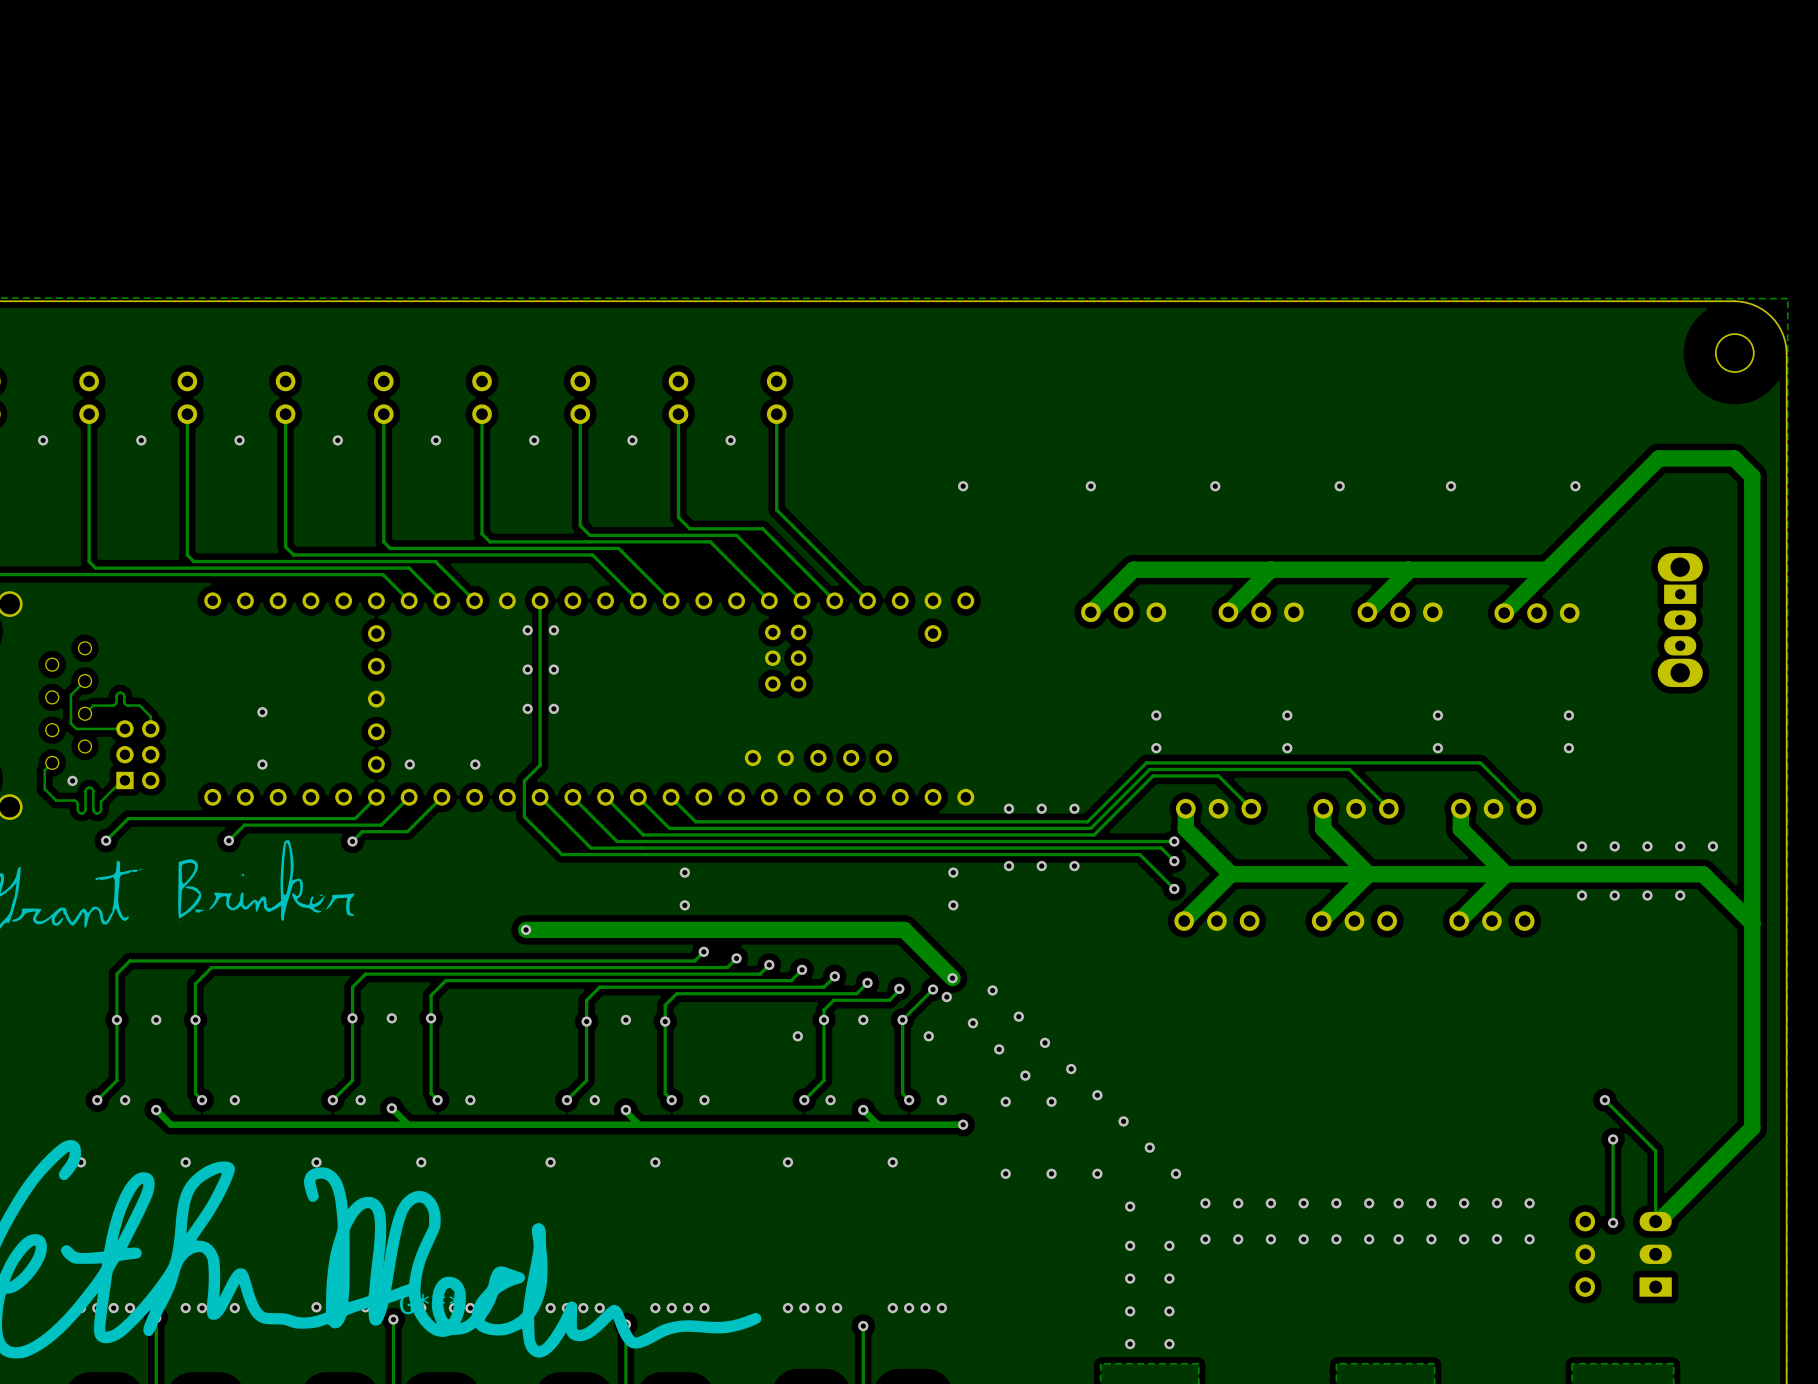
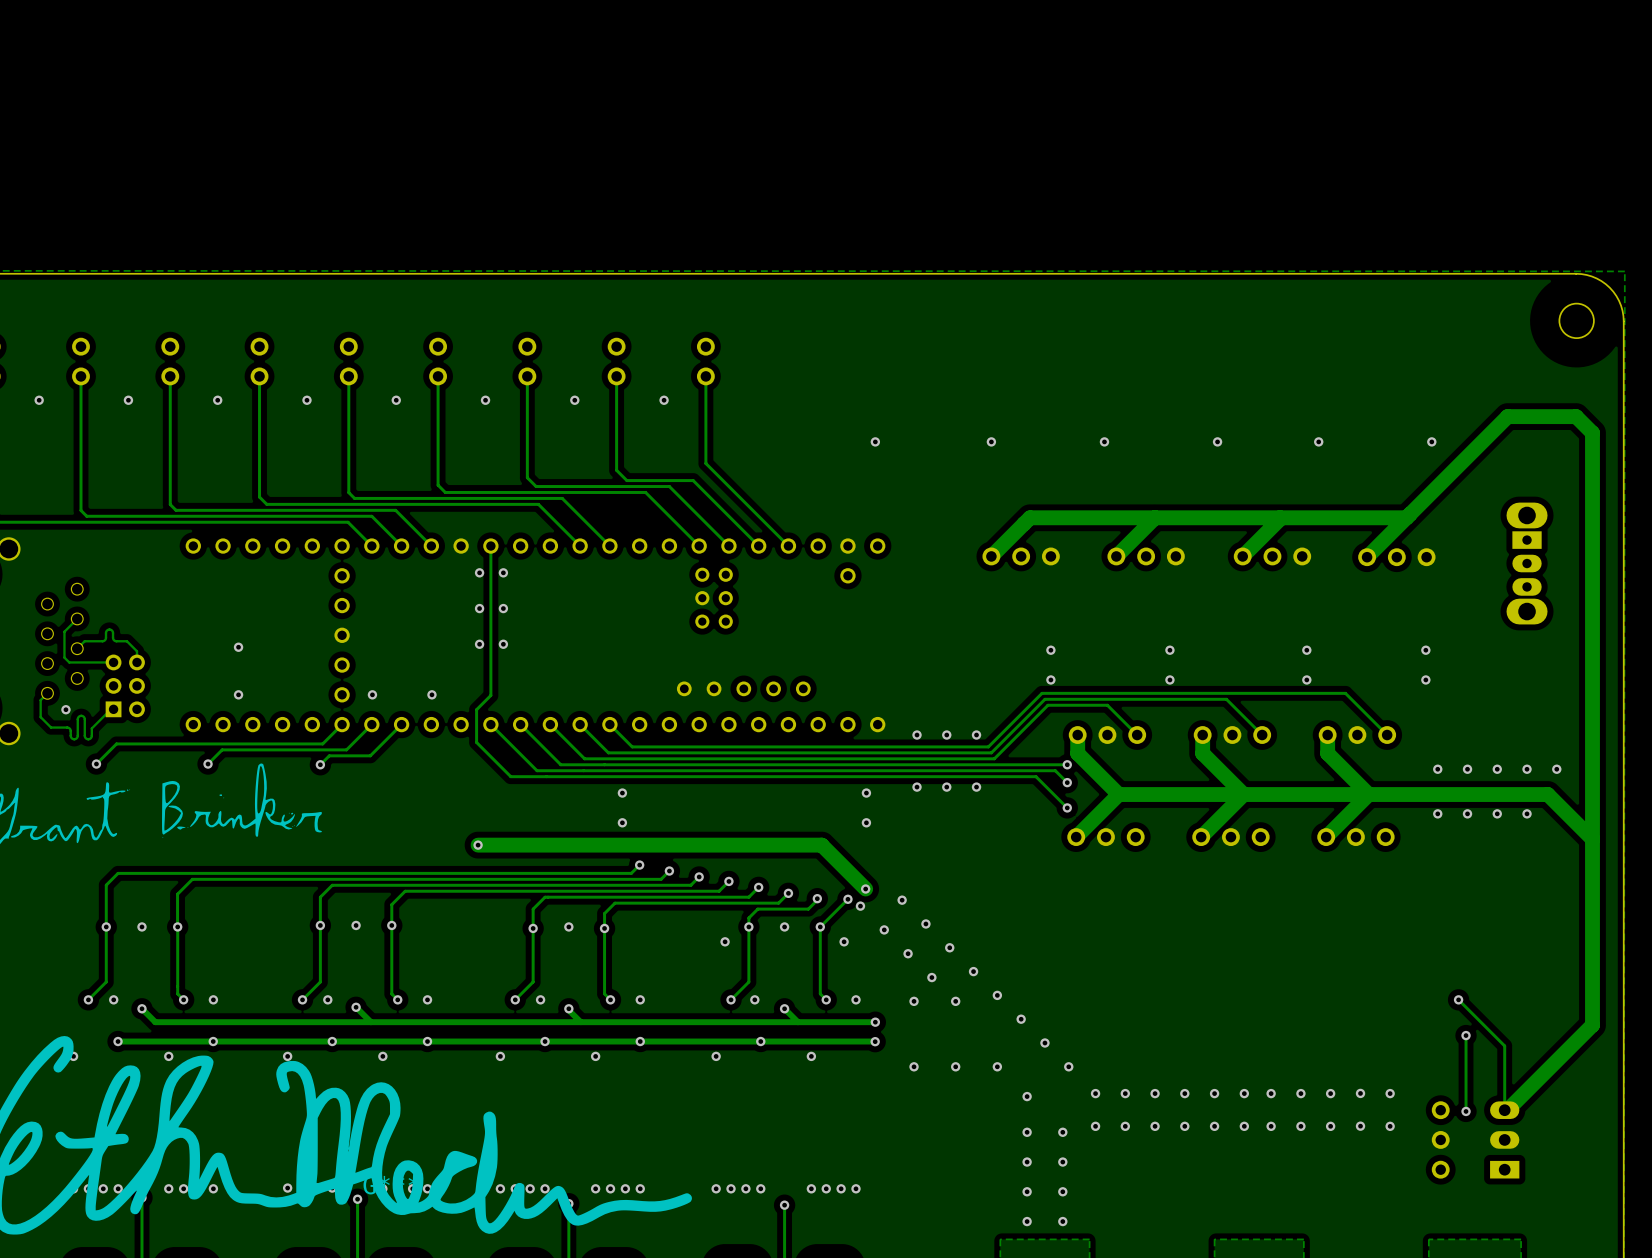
via: none -> (118, 1041)
via: none -> (213, 1041)
via: none -> (332, 1041)
via: none -> (427, 1041)
via: none -> (545, 1041)
via: none -> (640, 1041)
via: none -> (760, 1041)
track: none -> (875, 1041) (118, 1041)
via: none -> (875, 1041)

